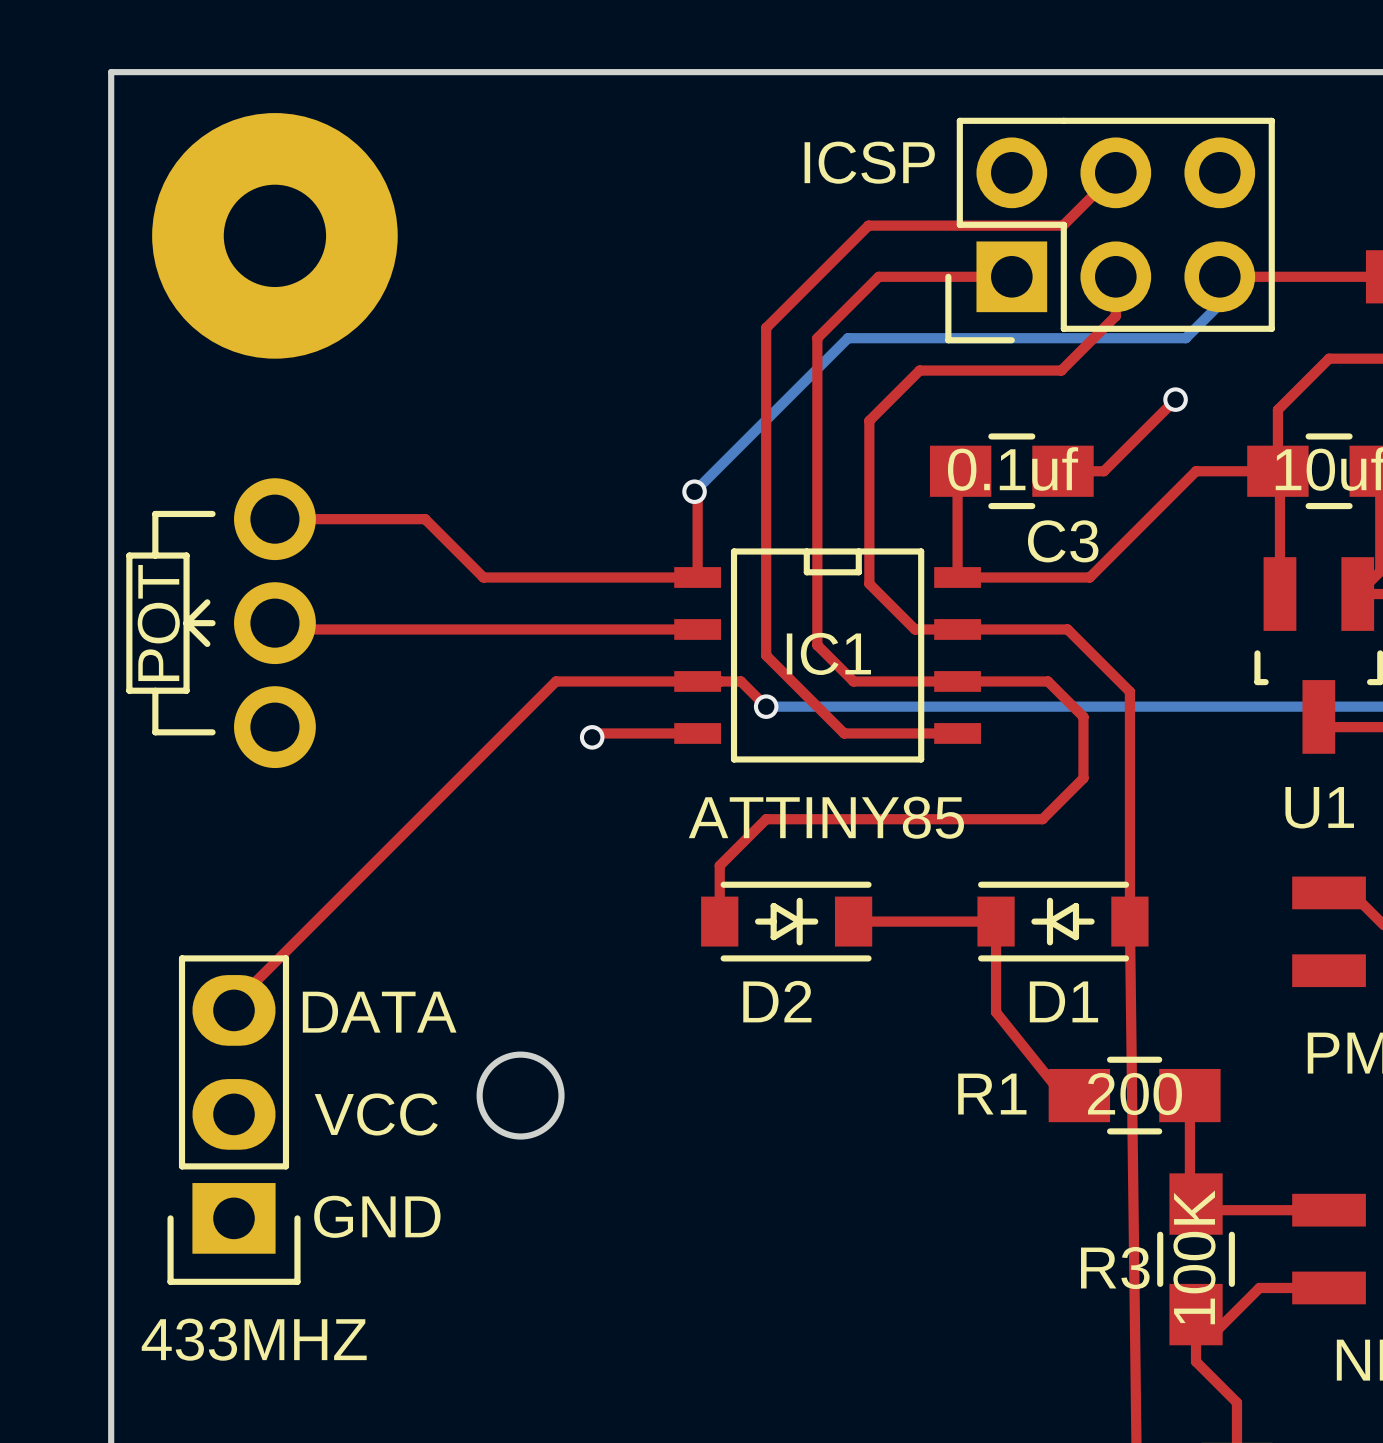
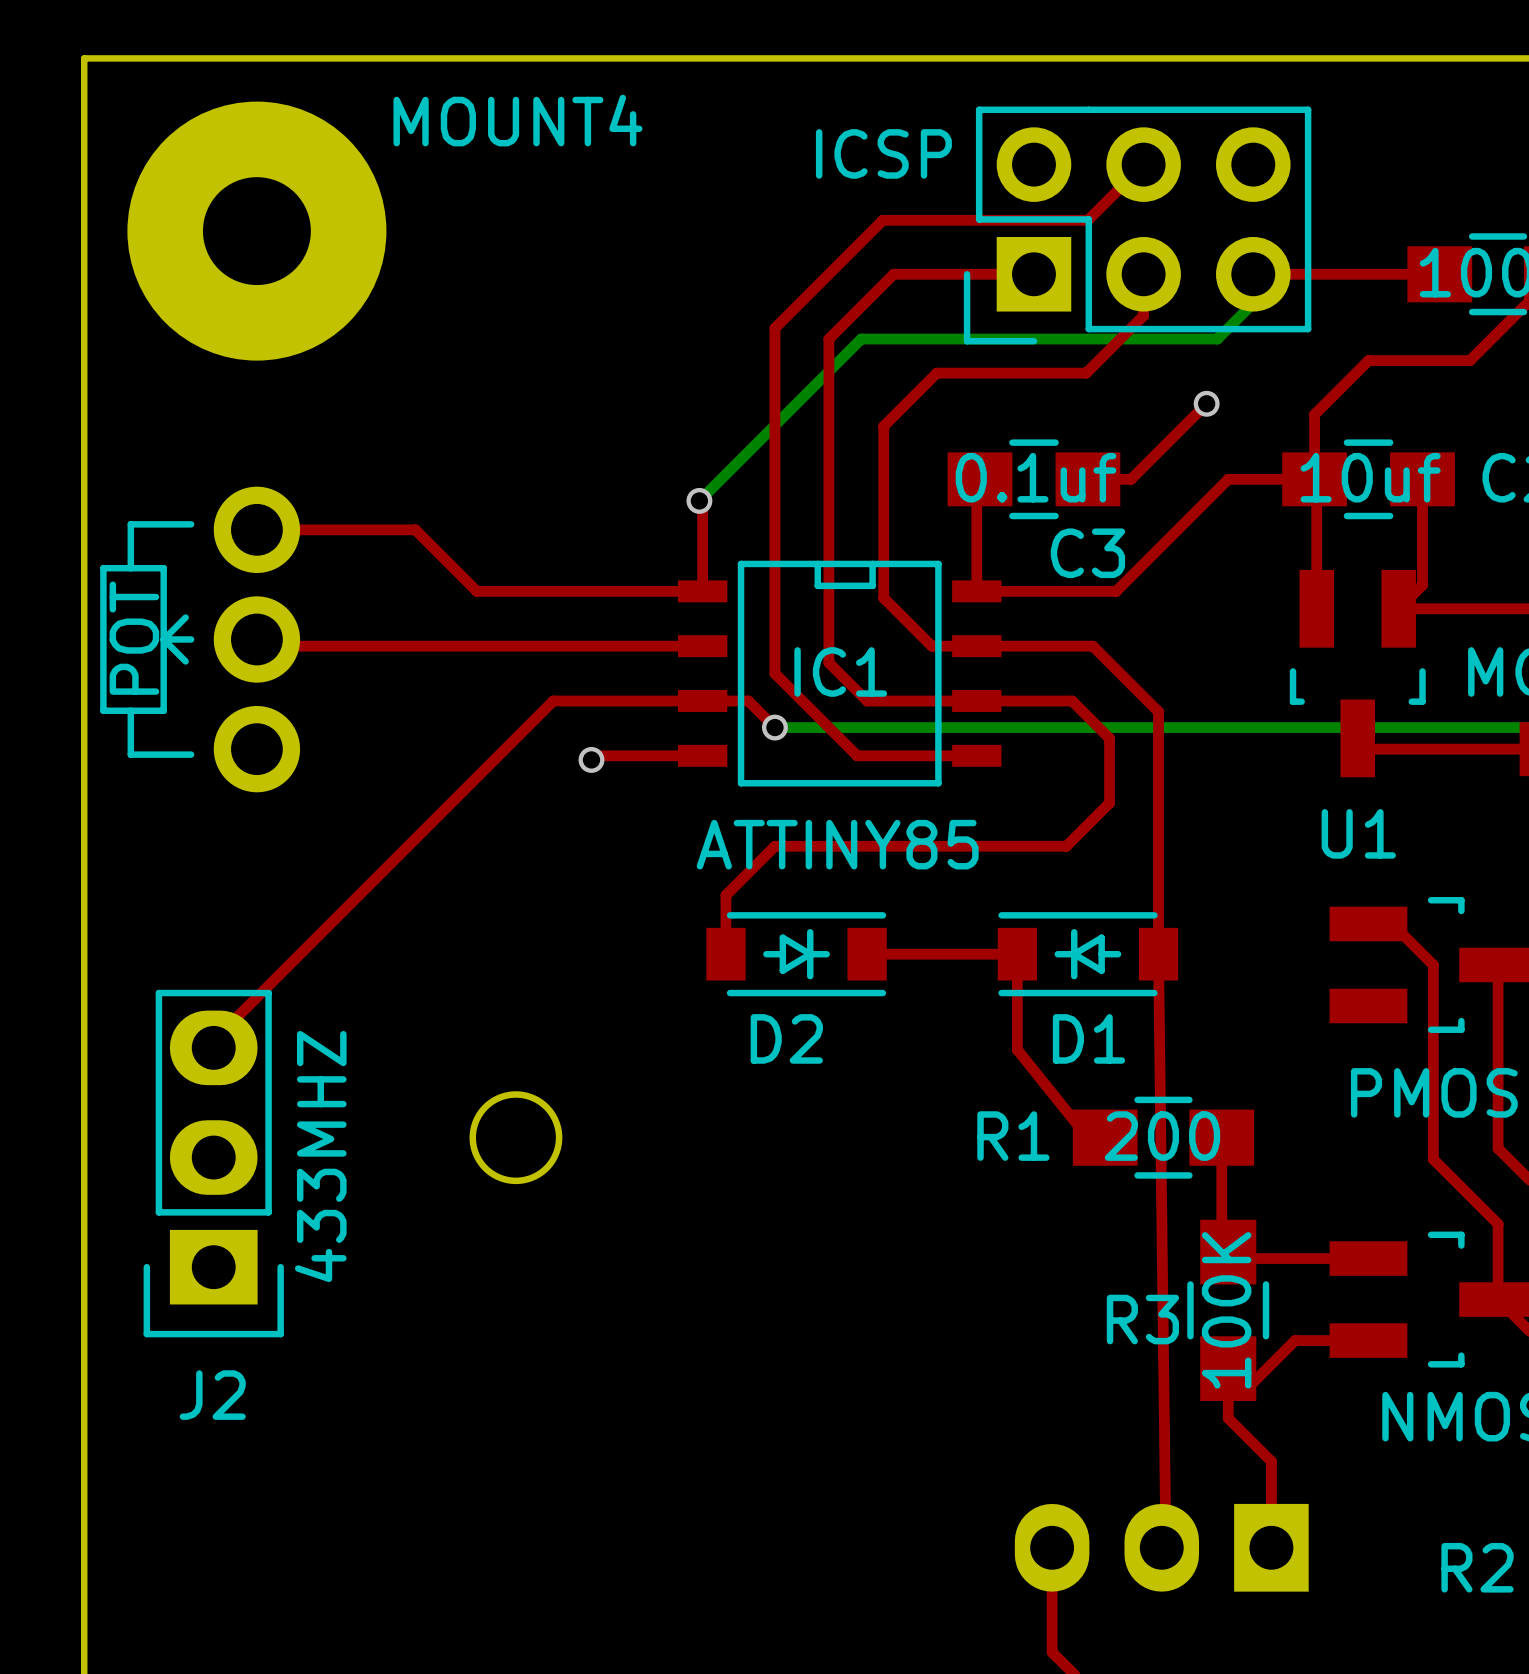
MOUNT4 name: none -> MOUNT4 (517, 120)
text: DATA (379, 1012) -> none
text: VCC (376, 1114) -> none
text: GND (377, 1216) -> none
J2 name: none -> J2 (212, 1395)
J2 value rotation: 0° (254, 1339) -> 90° counterclockwise (320, 1156)

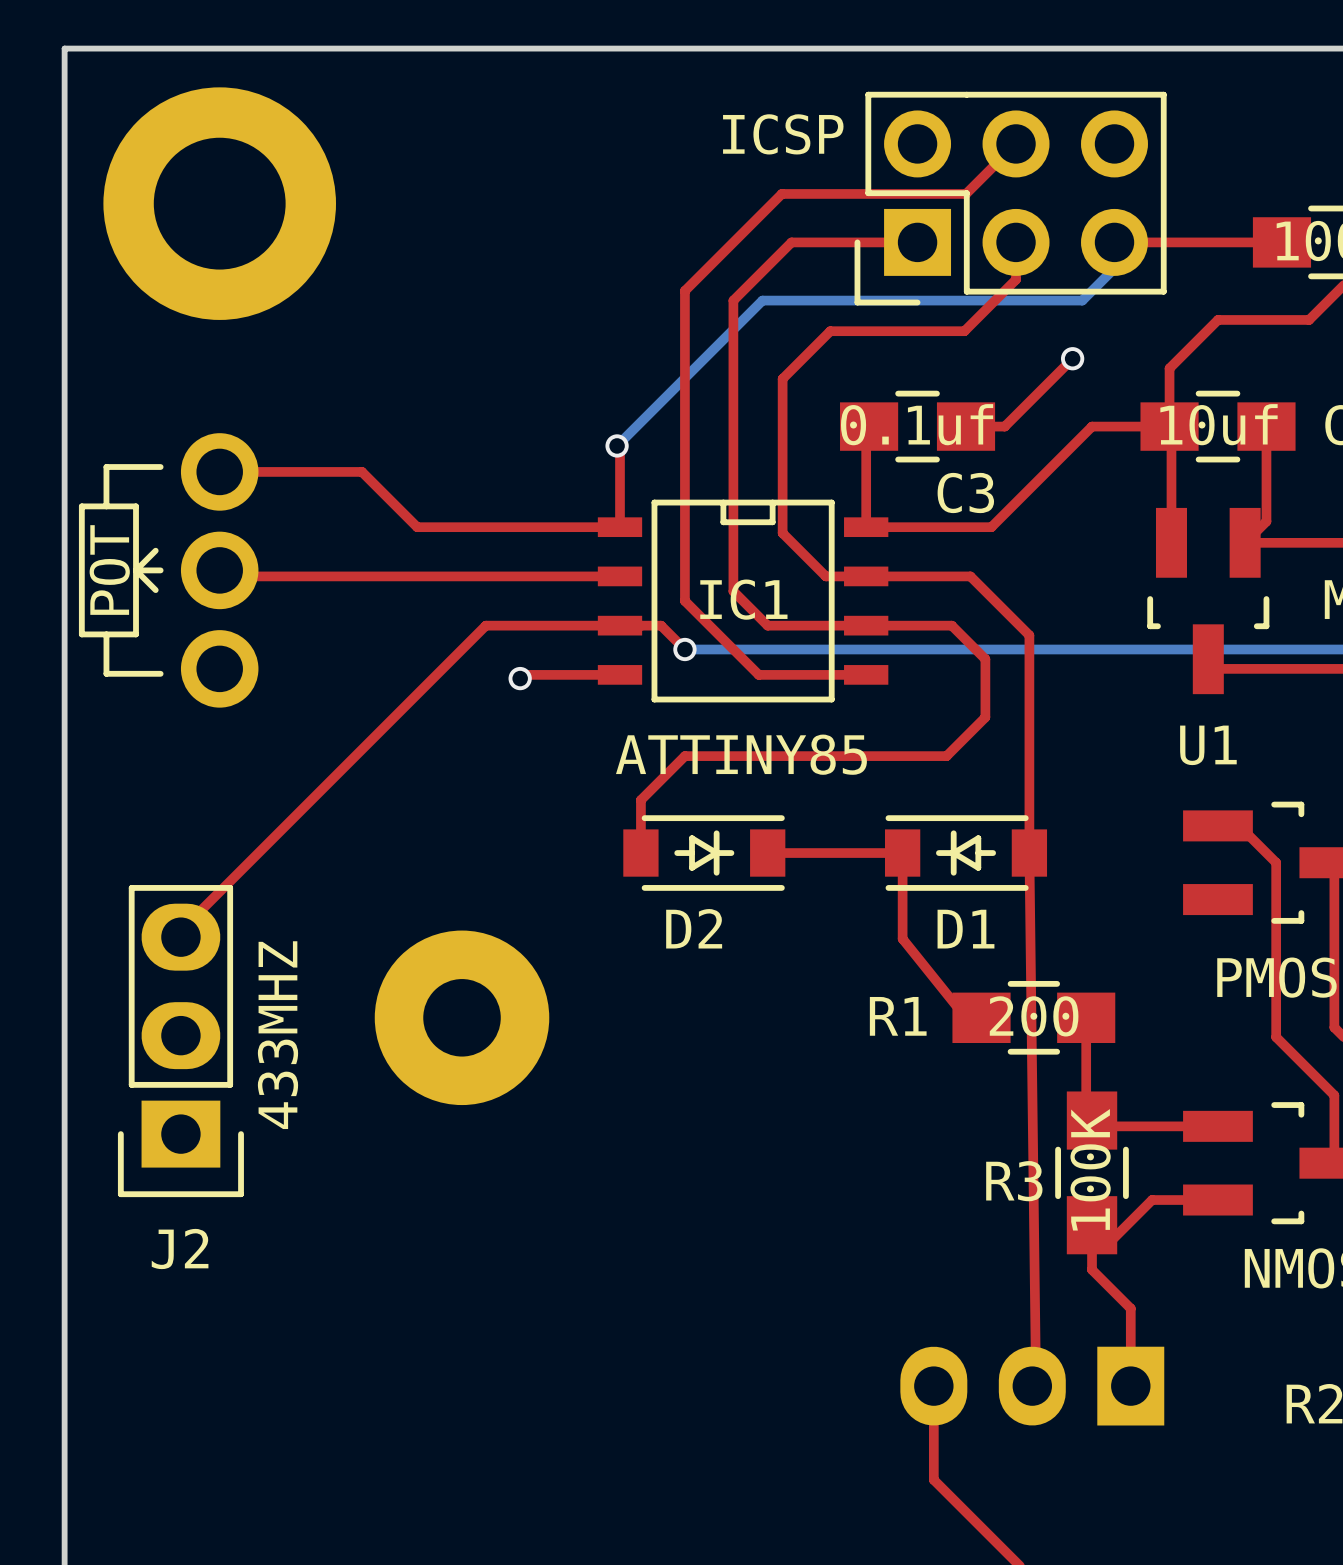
MOUNT4: (256, 231) -> none
part: none -> (219, 203)
round board edge: [469, 1091, 563, 1185] -> none
part: none -> (462, 1017)

